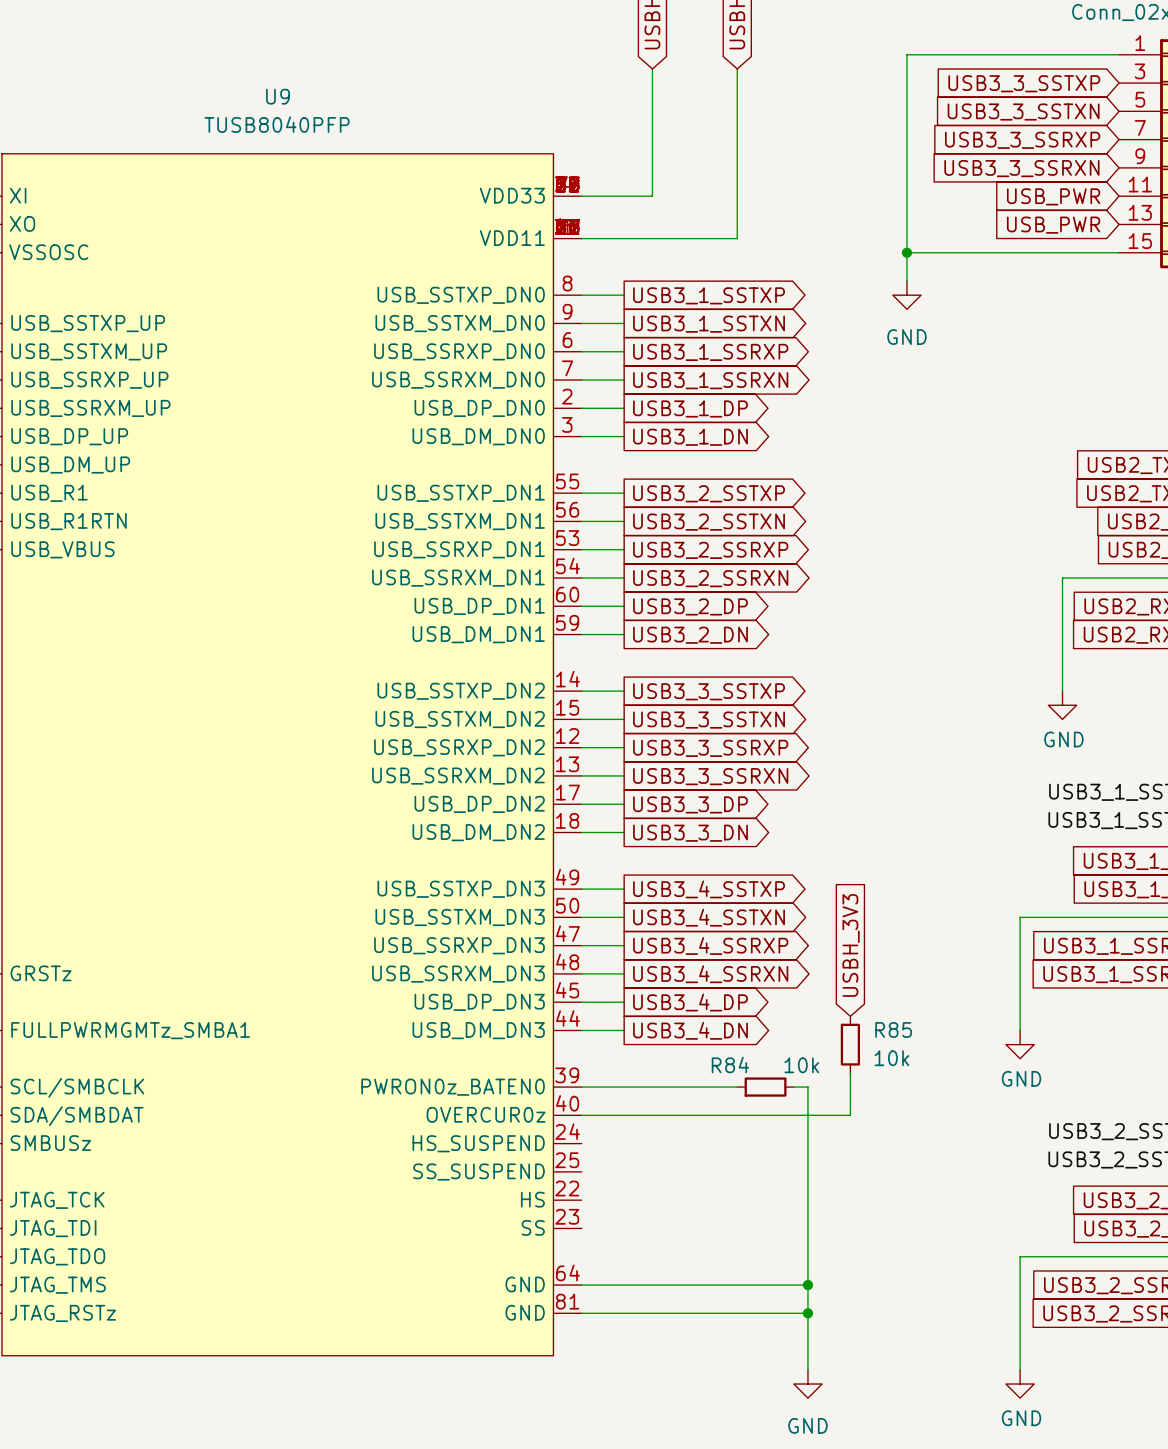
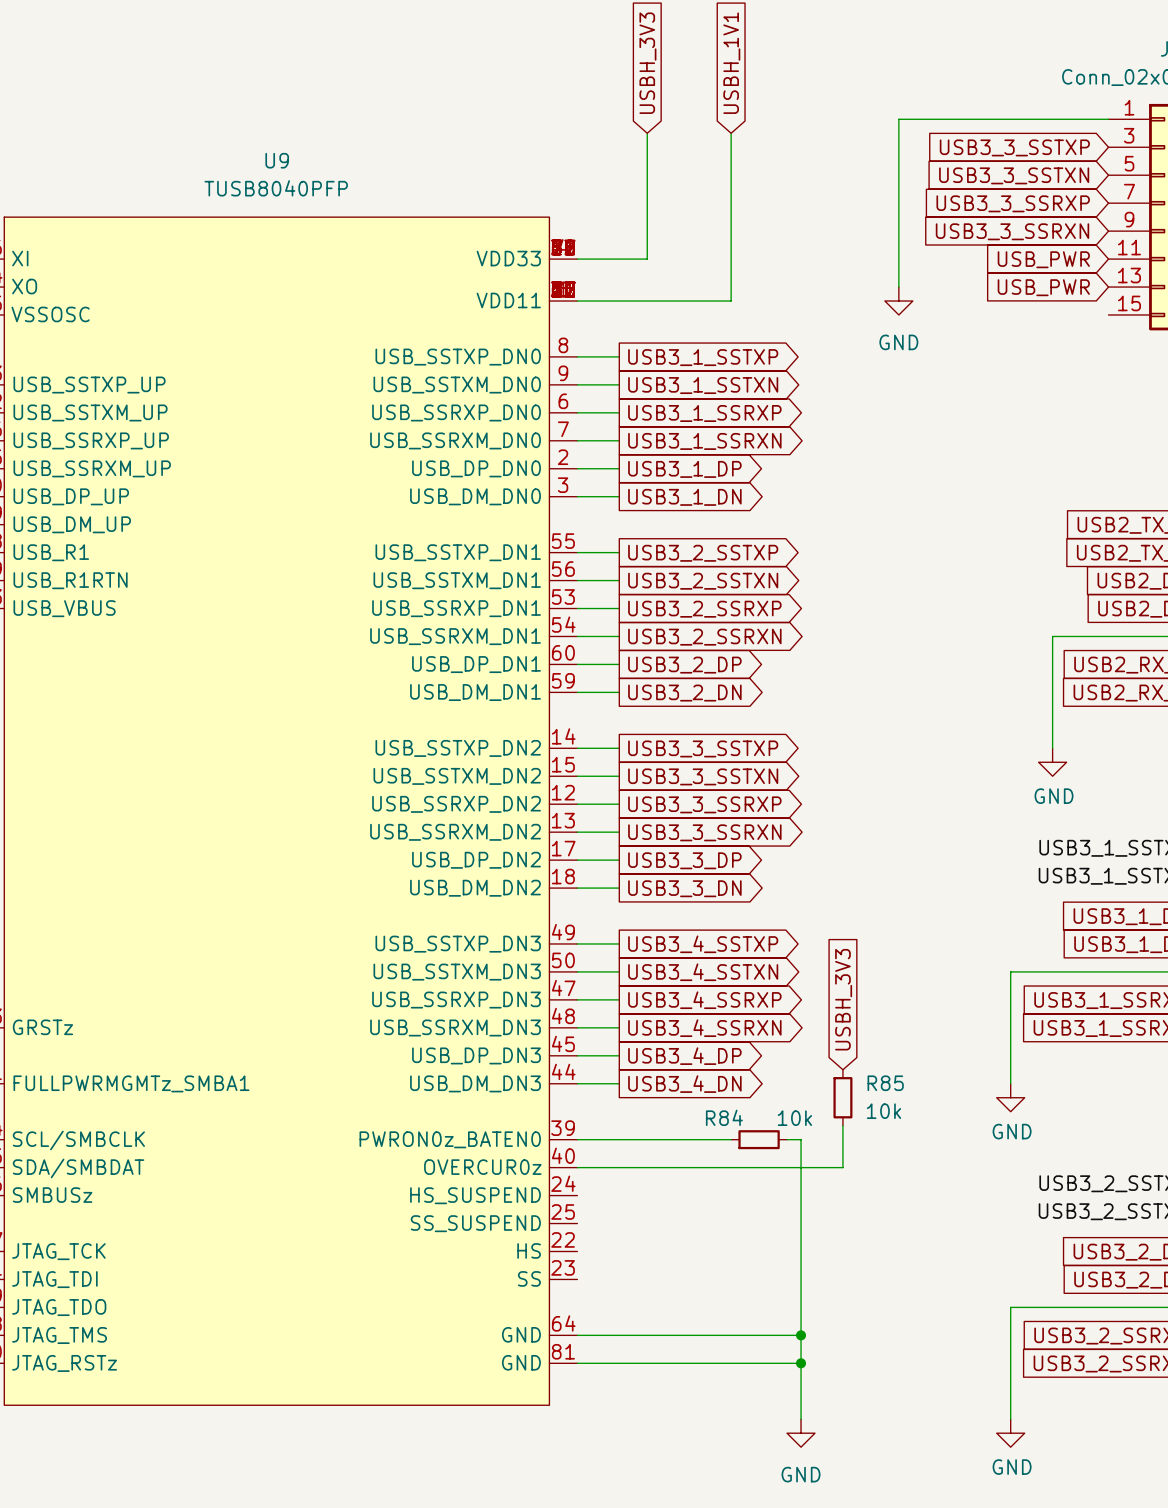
wire: (906, 224) (906, 281) -> none
wire: (906, 252) (1119, 252) -> none
junction: (906, 252) -> none
power symbol position: GND (906, 295) -> GND (898, 301)

